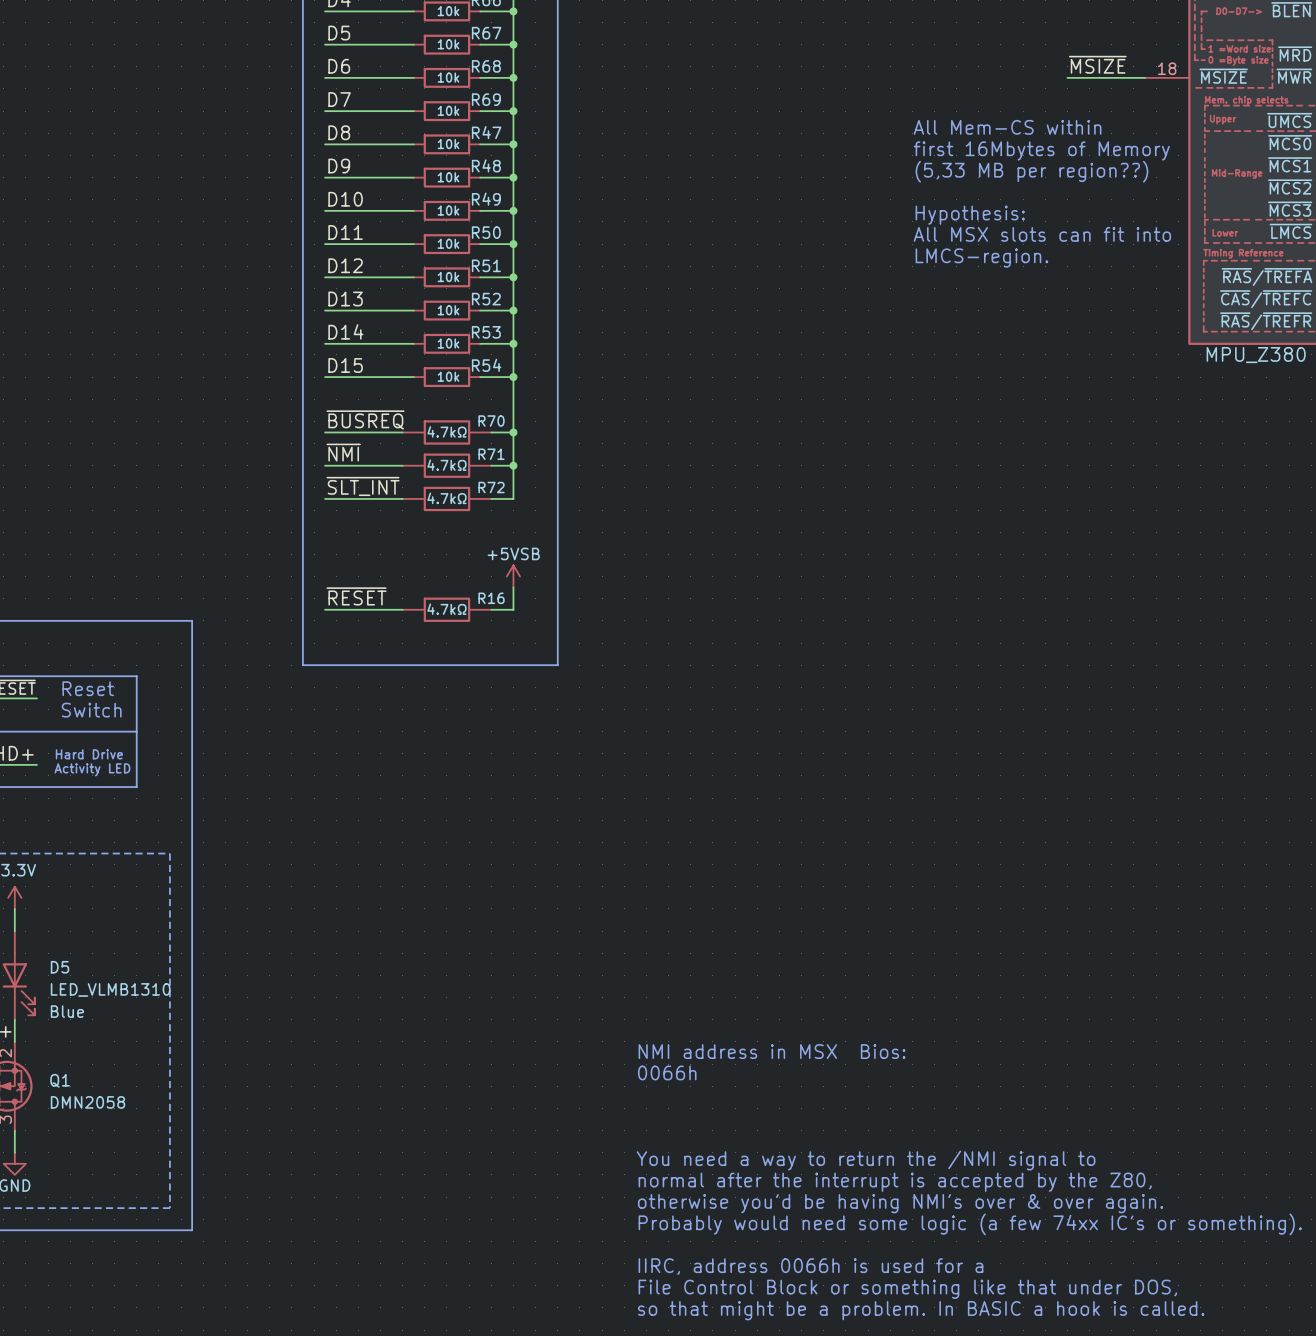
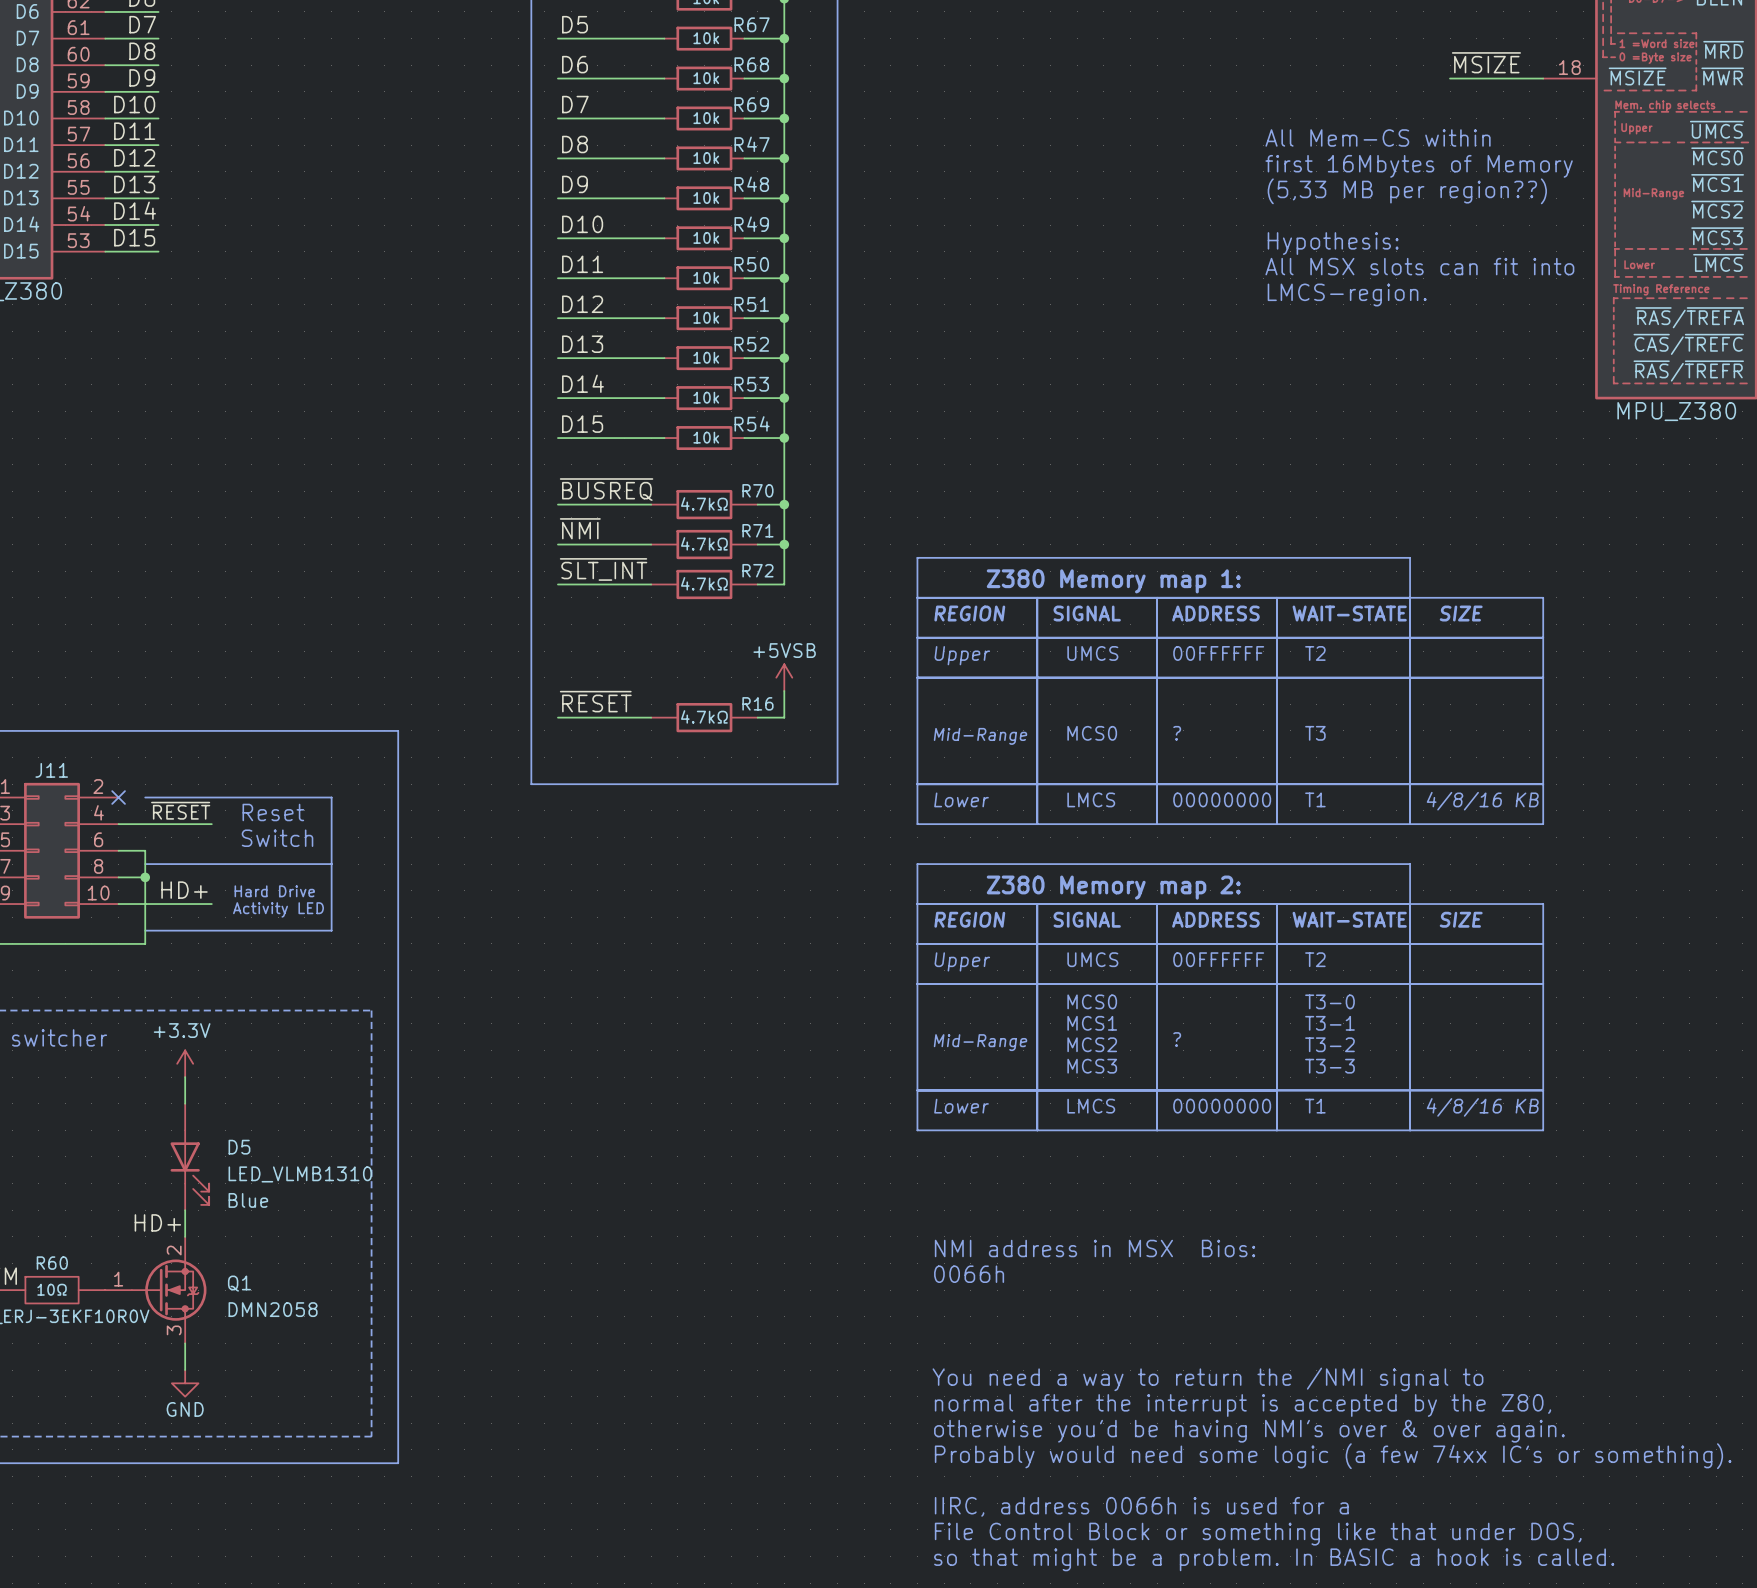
text: none -> Z380 Memory map 1: (1113, 581)
line: none -> (917, 597) (1543, 597) (1543, 824) (917, 824) (917, 557) (1410, 557) (1410, 824)
line: none -> (1037, 597) (1037, 824)
line: none -> (1157, 597) (1157, 824)
line: none -> (1276, 597) (1276, 824)
text: none -> REGION (969, 613)
text: none -> SIGNAL (1087, 613)
text: none -> ADDRESS (1215, 613)
text: none -> WAIT-STATE (1349, 613)
text: none -> SIZE (1461, 613)
line: none -> (917, 637) (1543, 637)
text: none -> UMCS (1092, 653)
text: none -> 00FFFFFF (1218, 653)
text: none -> T2 (1315, 653)
text: none -> Upper (962, 655)
line: none -> (917, 677) (1543, 677)
text: none -> MCS0 (1092, 733)
text: none -> ? (1177, 733)
text: none -> T3 (1315, 733)
text: none -> Mid-Range (980, 736)
line: none -> (917, 784) (1543, 784)
text: none -> Lower (961, 799)
text: none -> LMCS (1091, 799)
text: none -> 00000000 (1222, 799)
text: none -> T1 (1315, 799)
text: none -> 4/8/16 KB (1482, 801)
text: none -> Z380 Memory map 2: (1113, 887)
line: none -> (917, 904) (1543, 904) (1543, 1130) (917, 1130) (917, 864) (1410, 864) (1410, 1130)
line: none -> (1037, 904) (1037, 1130)
line: none -> (1157, 904) (1157, 1130)
line: none -> (1276, 904) (1276, 1130)
text: none -> REGION (969, 919)
text: none -> SIGNAL (1087, 919)
text: none -> ADDRESS (1215, 919)
text: none -> WAIT-STATE (1349, 919)
text: none -> SIZE (1461, 919)
line: none -> (917, 943) (1543, 943)
text: none -> UMCS (1092, 959)
text: none -> 00FFFFFF (1218, 959)
text: none -> T2 (1315, 959)
text: none -> Upper (962, 961)
line: none -> (917, 983) (1543, 983)
text: none -> MCS0 (1092, 1001)
text: none -> T3-0 (1329, 1001)
text: none -> MCS1 (1092, 1023)
text: none -> T3-1 (1329, 1023)
text: none -> ? (1177, 1039)
text: none -> Mid-Range (980, 1042)
text: none -> MCS2 (1092, 1044)
text: none -> T3-2 (1329, 1044)
text: none -> MCS3 (1092, 1066)
text: none -> T3-3 (1329, 1066)
line: none -> (917, 1090) (1543, 1090)
text: none -> Lower (961, 1106)
text: none -> LMCS (1091, 1106)
text: none -> 00000000 (1222, 1106)
text: none -> T1 (1315, 1106)
text: none -> 4/8/16 KB (1482, 1107)

